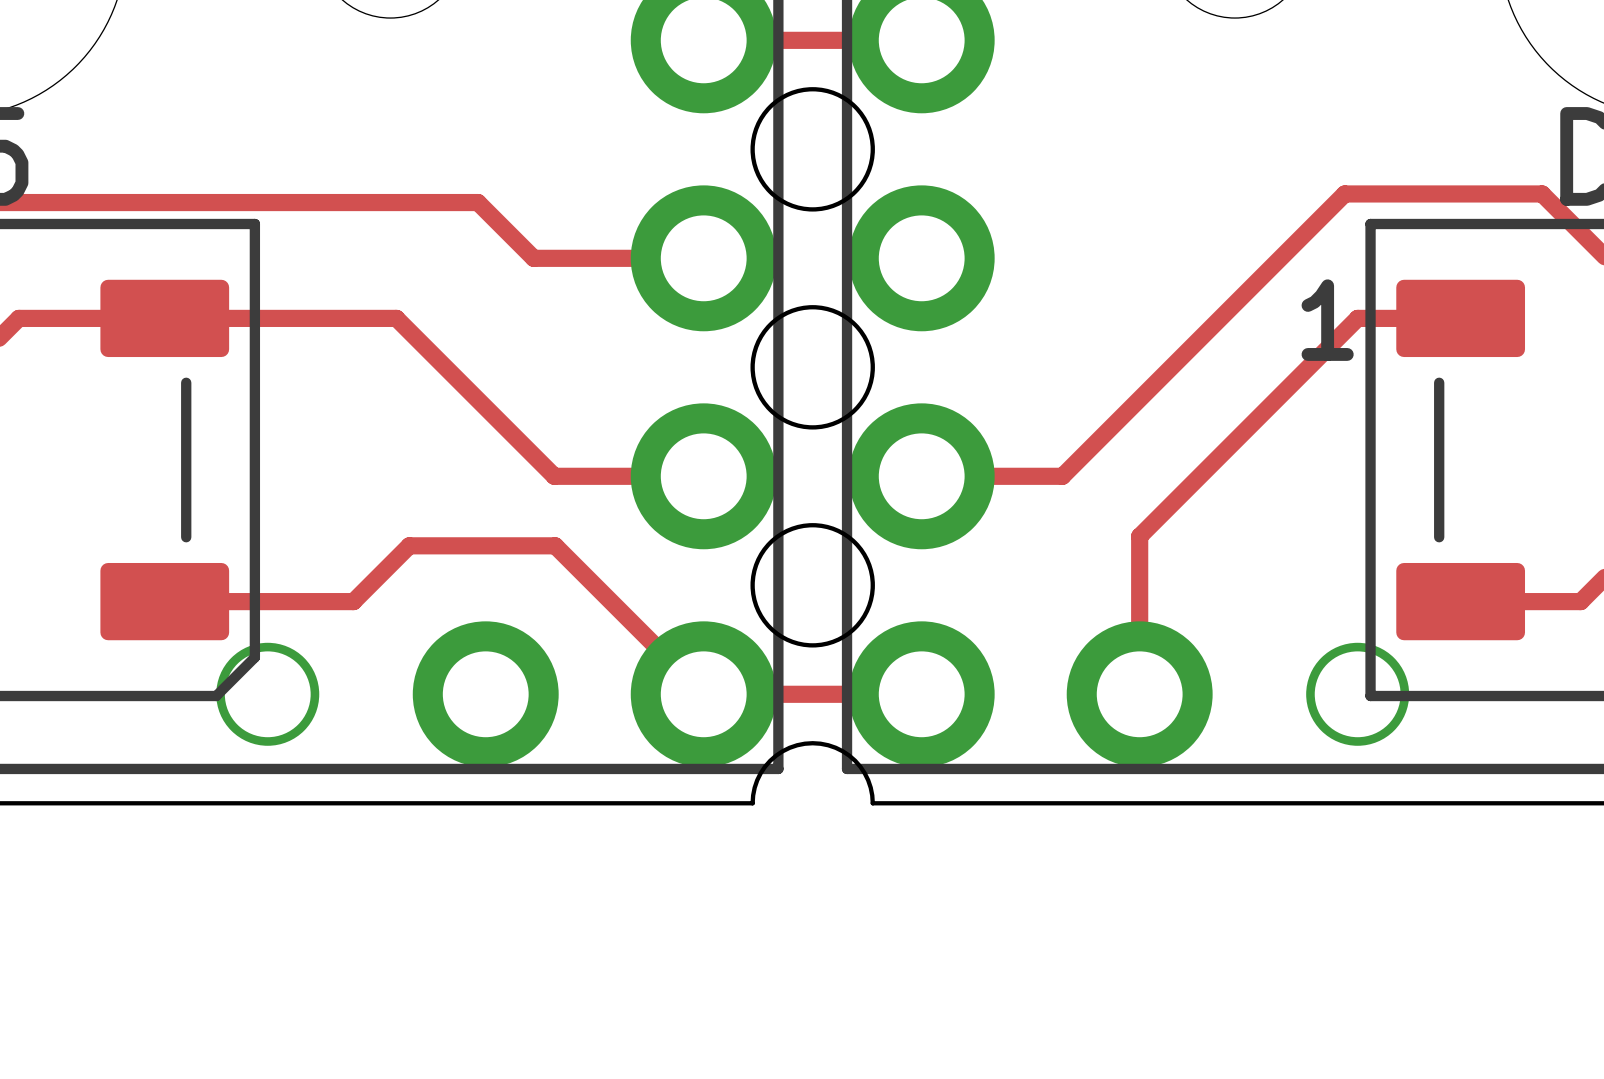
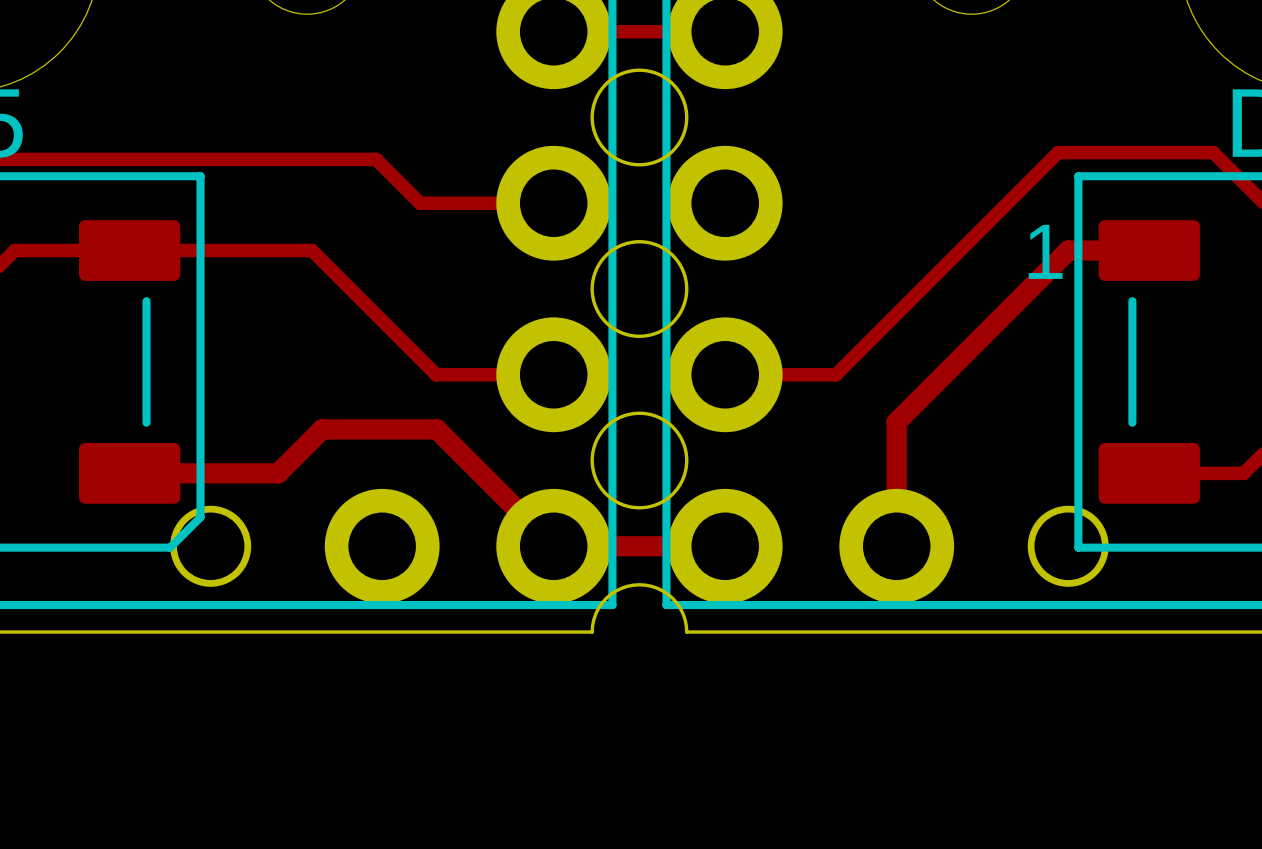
track width: thin (1460, 318) (1357, 318) (1139, 536) (1139, 694) -> thick (1149, 250) (1068, 250) (896, 422) (896, 546)
track width: thin (164, 601) (353, 601) (409, 545) (555, 545) (703, 694) (921, 694) -> thick (129, 473) (278, 473) (322, 429) (436, 429) (553, 546) (725, 546)

